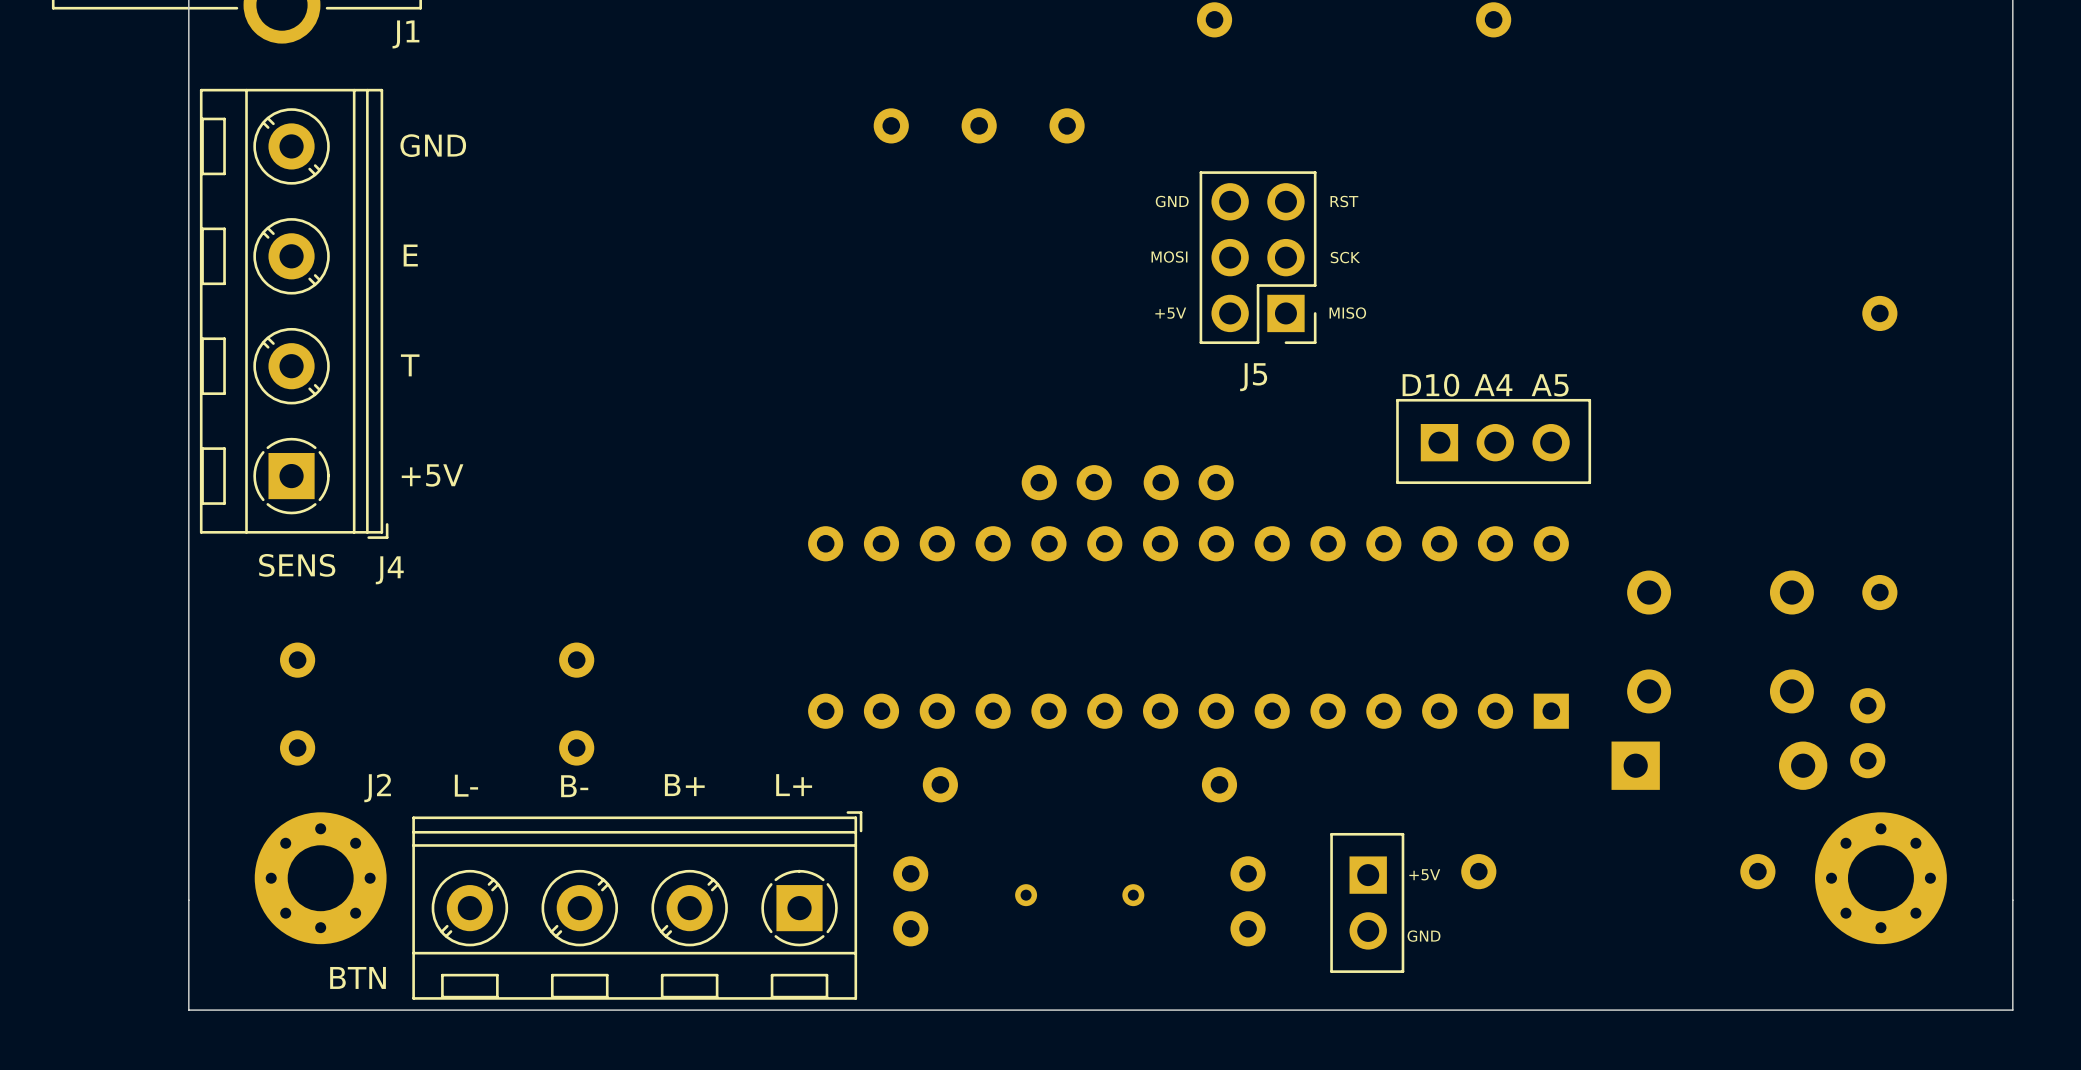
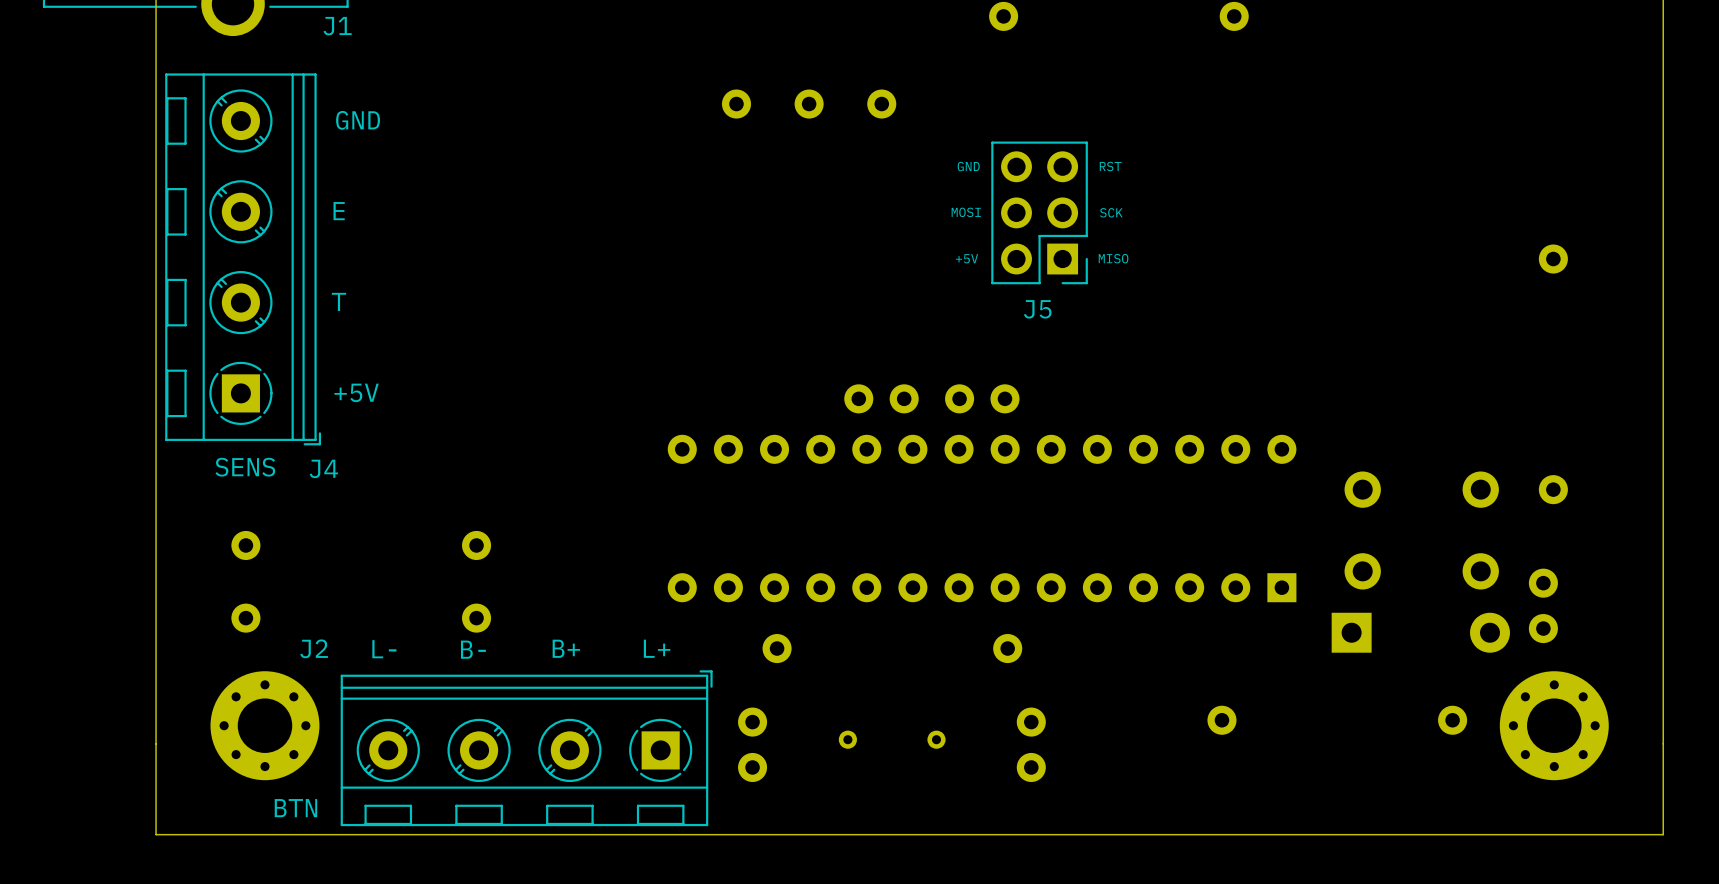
text: D10 (1430, 385) -> none
text: A4 (1493, 385) -> none
text: A5 (1550, 385) -> none
line: (1589, 400) (1589, 482) (1397, 482) (1397, 400) (1589, 400) -> none
part: (1495, 442) -> none
line: (1402, 834) (1331, 834) (1331, 971) (1402, 971) (1402, 834) -> none
text: +5V (1424, 874) -> none
part: (1368, 903) -> none
text: GND (1424, 936) -> none

